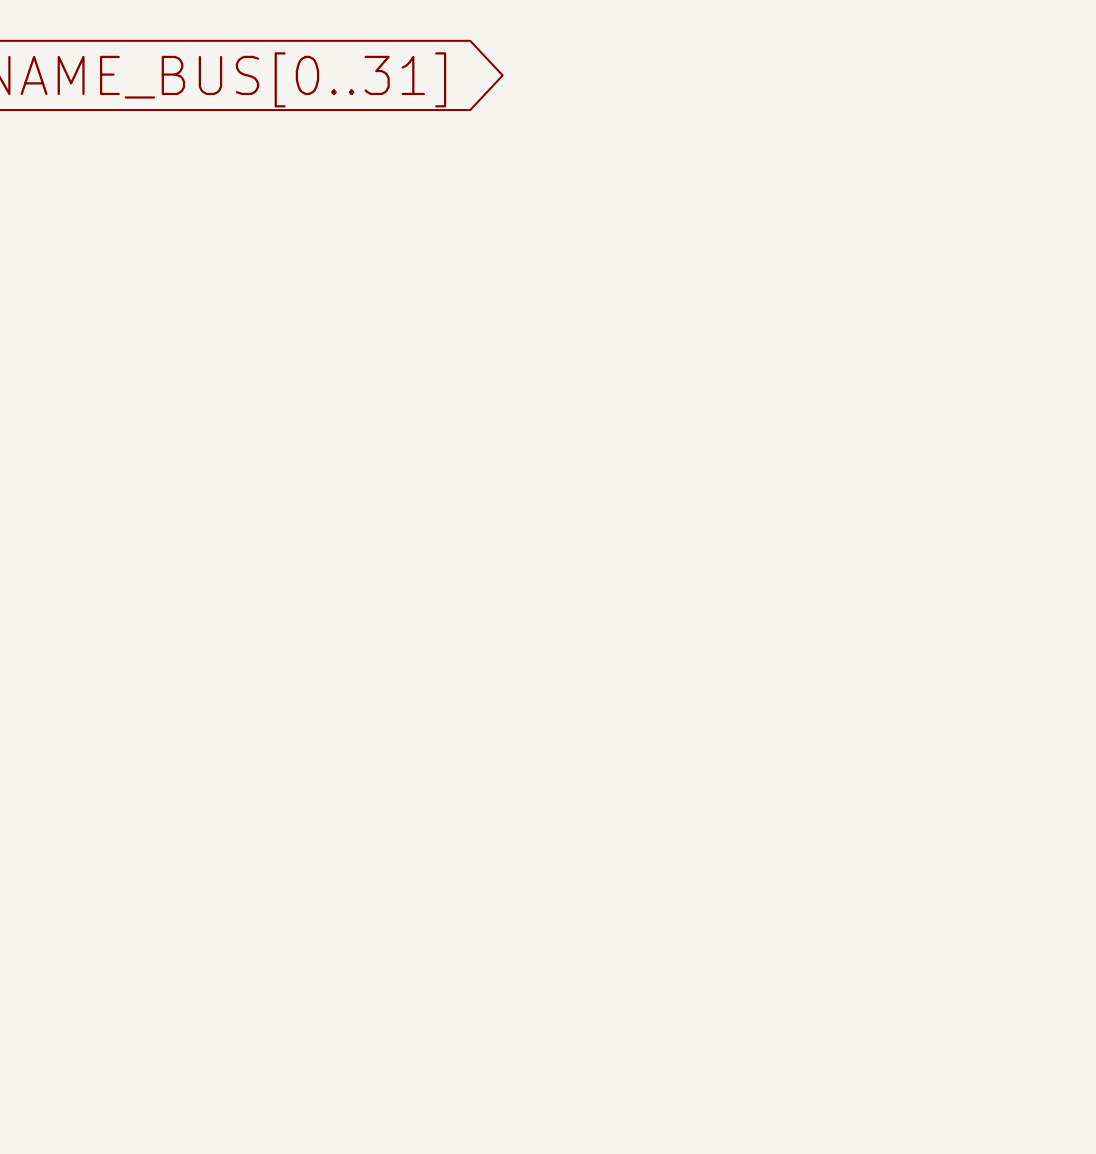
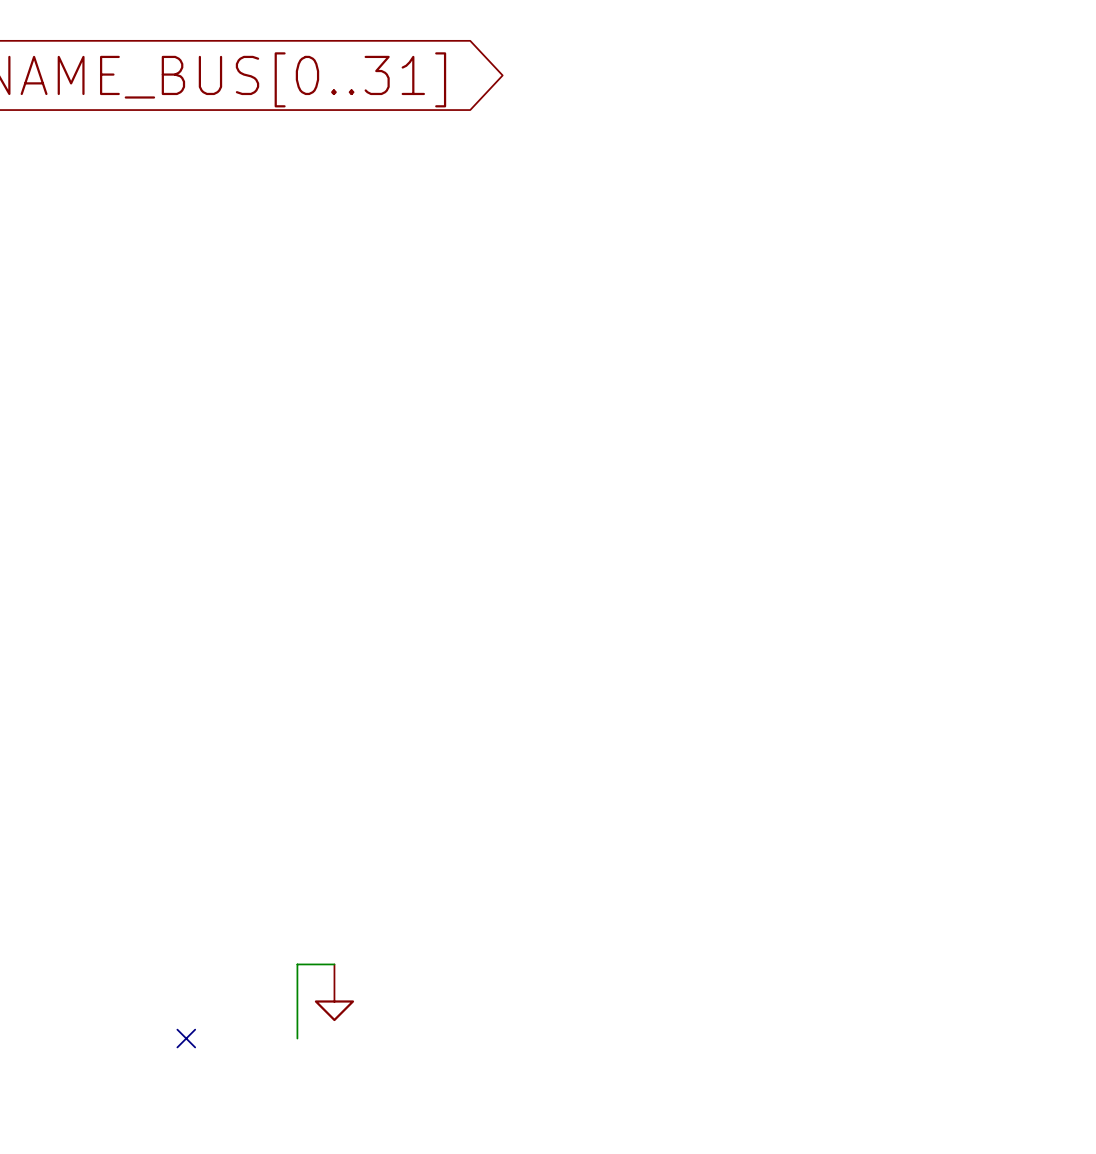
wire: none -> (334, 964) (297, 964) (297, 1038)
power symbol: none -> (334, 992)
no-connect mark: none -> (186, 1038)

